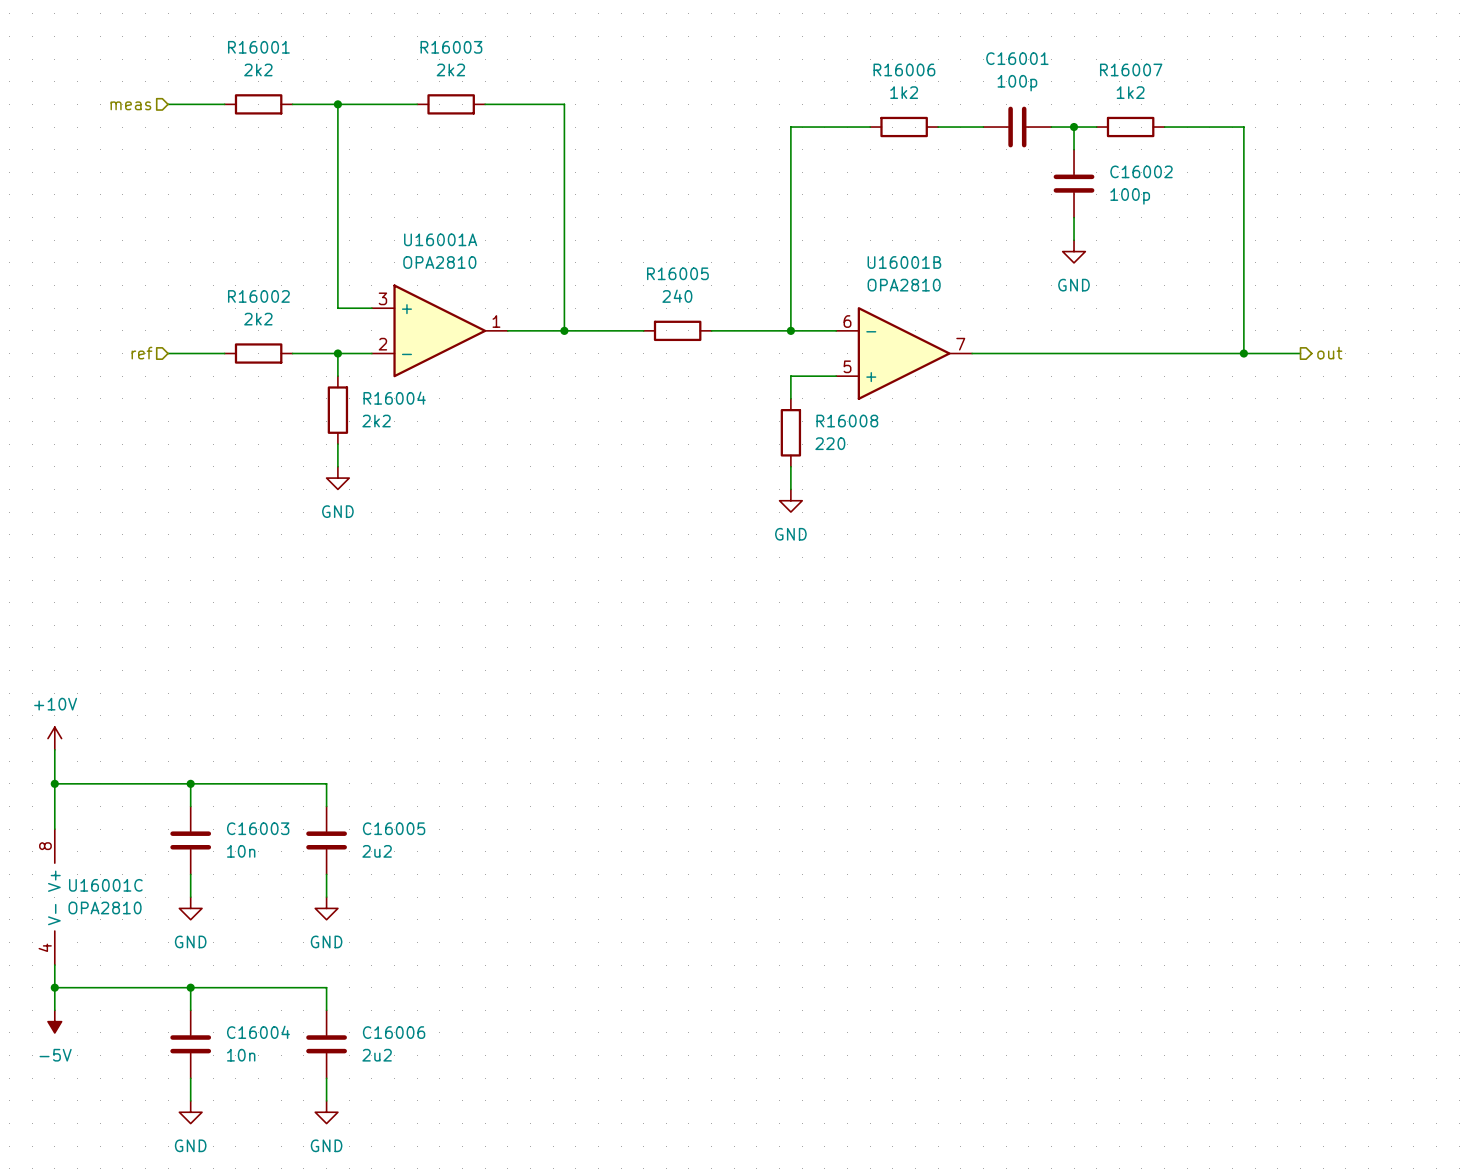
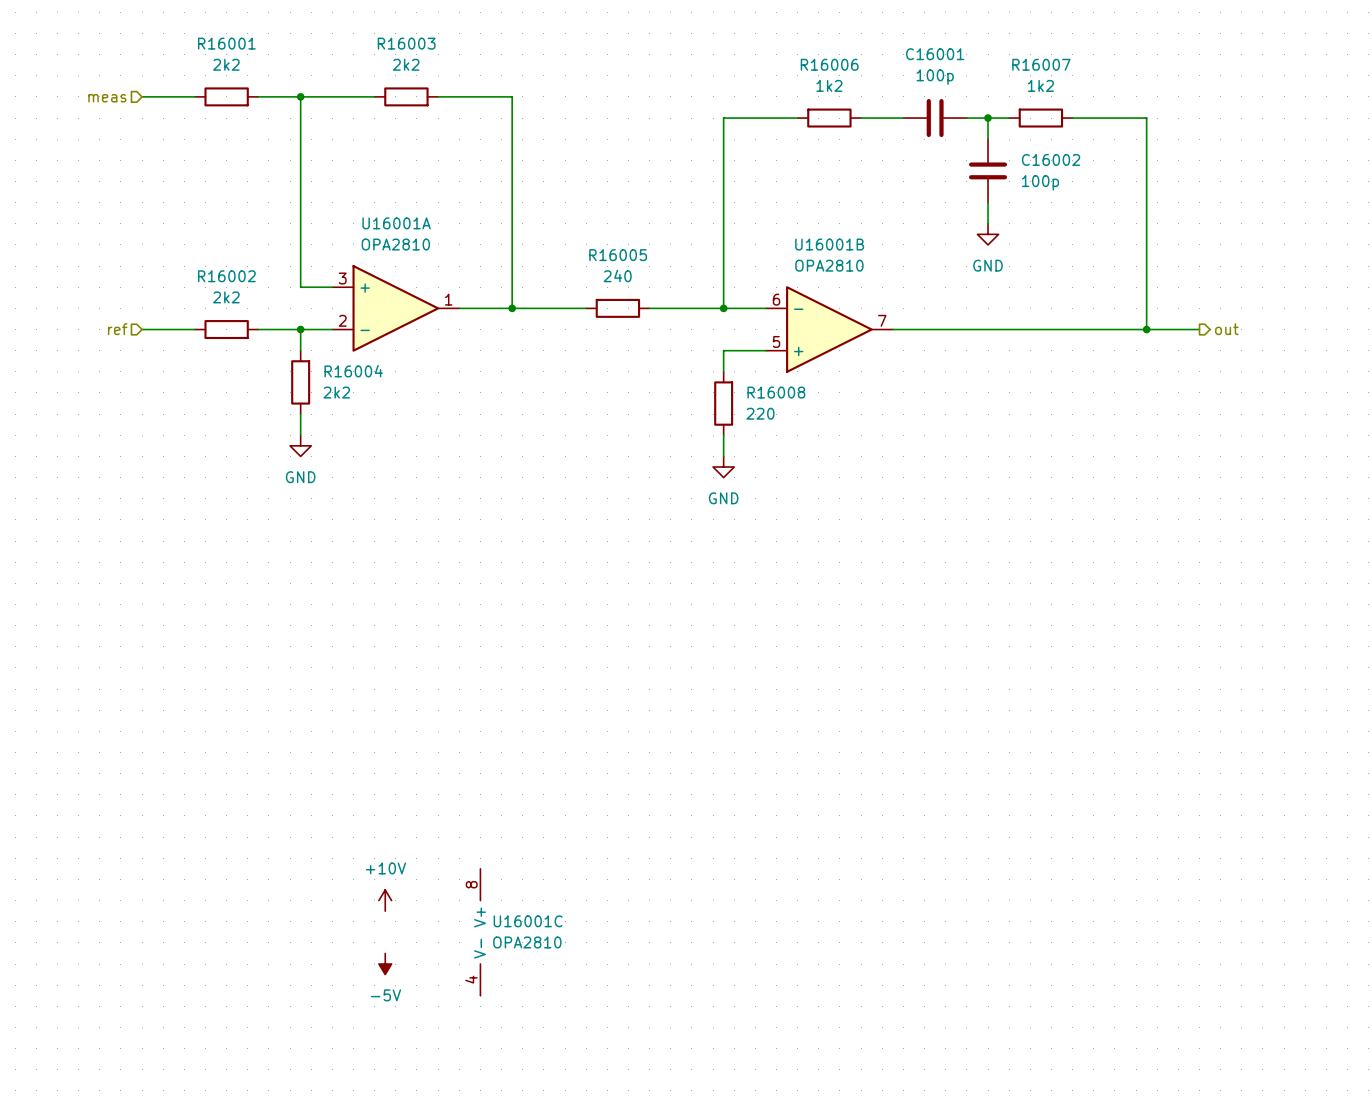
power symbol: +10V (54, 738) -> none
wire: (54, 749) (54, 829) -> none
wire: (54, 783) (326, 783) (326, 806) -> none
junction: (54, 783) -> none
wire: (190, 783) (190, 806) -> none
junction: (190, 783) -> none
C16003: 10n (190, 840) -> none
C16005: 2u2 (326, 840) -> none
wire: (190, 874) (190, 897) -> none
wire: (326, 874) (326, 897) -> none
U16001C position: (54, 897) -> (480, 932)
power symbol: GND (190, 908) -> none
power symbol: GND (326, 908) -> none
wire: (54, 965) (54, 1010) -> none
power symbol: none -> +10V (385, 900)
wire: (54, 987) (326, 987) (326, 1010) -> none
junction: (54, 987) -> none
wire: (190, 987) (190, 1010) -> none
junction: (190, 987) -> none
power symbol: -5V (54, 1021) -> none
power symbol: none -> -5V (385, 964)
C16004: 10n (190, 1044) -> none
C16006: 2u2 (326, 1044) -> none
wire: (190, 1078) (190, 1100) -> none
wire: (326, 1078) (326, 1100) -> none
power symbol: GND (190, 1112) -> none
power symbol: GND (326, 1112) -> none

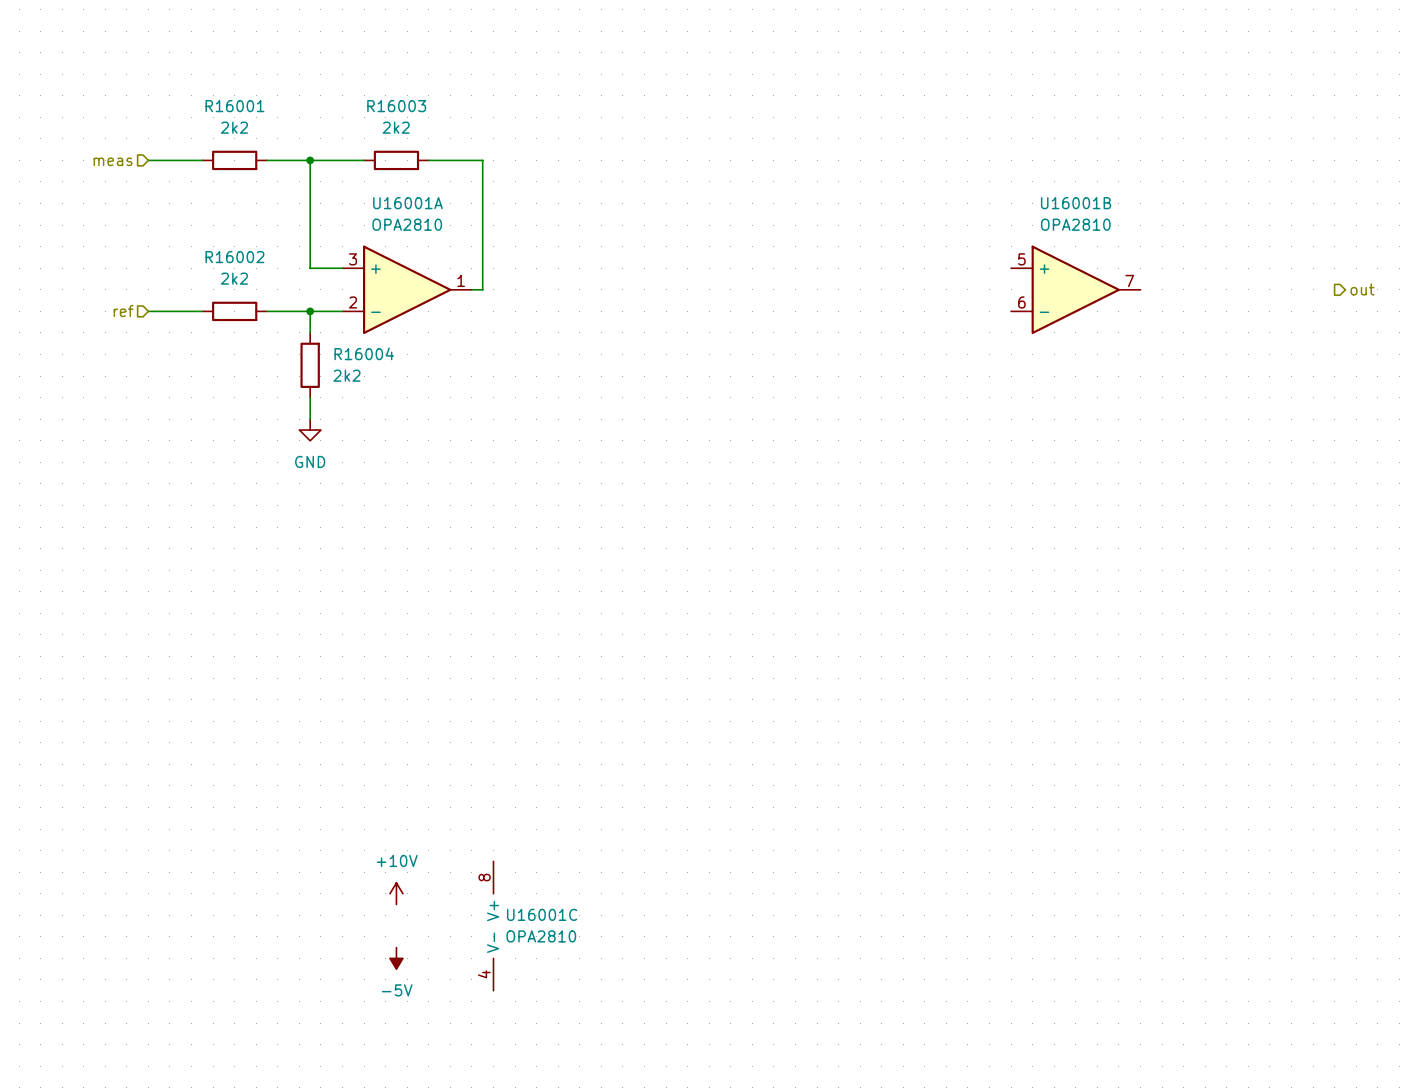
wire: (142, 96) (194, 96) -> (148, 160) (202, 160)
R16001 position: (226, 96) -> (234, 160)
wire: (258, 96) (374, 96) -> none
wire: (300, 96) (300, 181) -> none
junction: (300, 96) -> none
R16003 position: (406, 96) -> (396, 160)
wire: (438, 96) (512, 96) (512, 308) -> none
hierarchical label position: meas (107, 98) -> meas (113, 161)
wire: (797, 118) (723, 118) (723, 308) -> none
R16006: 1k2 (829, 118) -> none
wire: (861, 118) (903, 118) -> none
C16001: 100p (935, 118) -> none
wire: (966, 118) (1009, 118) -> none
wire: (988, 118) (988, 139) -> none
junction: (988, 118) -> none
R16007: 1k2 (1040, 118) -> none
wire: (1072, 118) (1146, 118) (1146, 329) -> none
C16002: 100p (988, 170) -> none
wire: none -> (267, 160) (364, 160)
junction: none -> (310, 160)
wire: (988, 202) (988, 223) -> none
power symbol: GND (988, 234) -> none
wire: (469, 308) (586, 308) -> (482, 289) (482, 160) (428, 160)
junction: (512, 308) -> none
R16005: 240 (617, 308) -> none
wire: (649, 308) (765, 308) -> none
junction: (723, 308) -> none
U16001B flip: as is (829, 329) -> up-down (1075, 289)
U16001B position: (829, 329) -> (1075, 289)
wire: (892, 329) (1199, 329) -> none
junction: (1146, 329) -> none
hierarchical label position: out (1226, 329) -> out (1362, 289)
wire: (765, 350) (723, 350) (723, 371) -> none
R16008: 220 (723, 403) -> none
wire: (723, 435) (723, 456) -> none
power symbol: GND (723, 467) -> none

